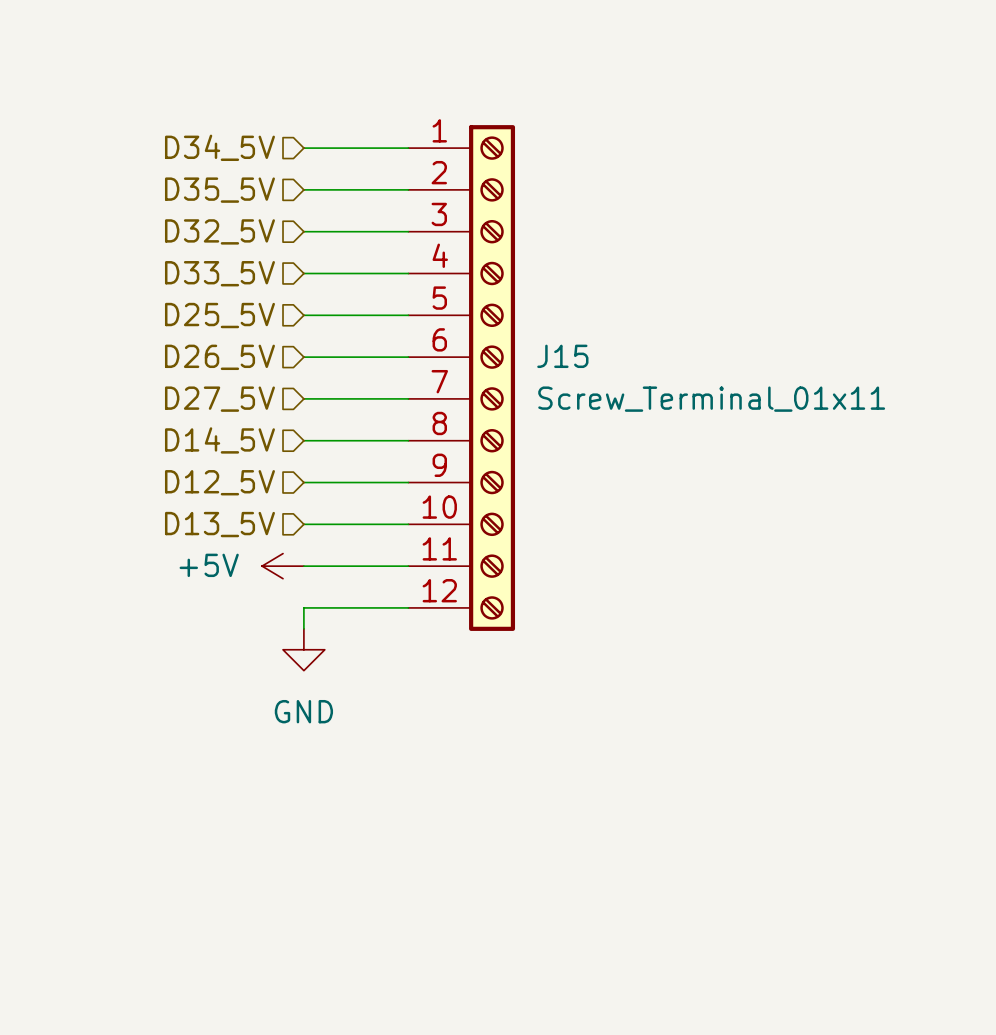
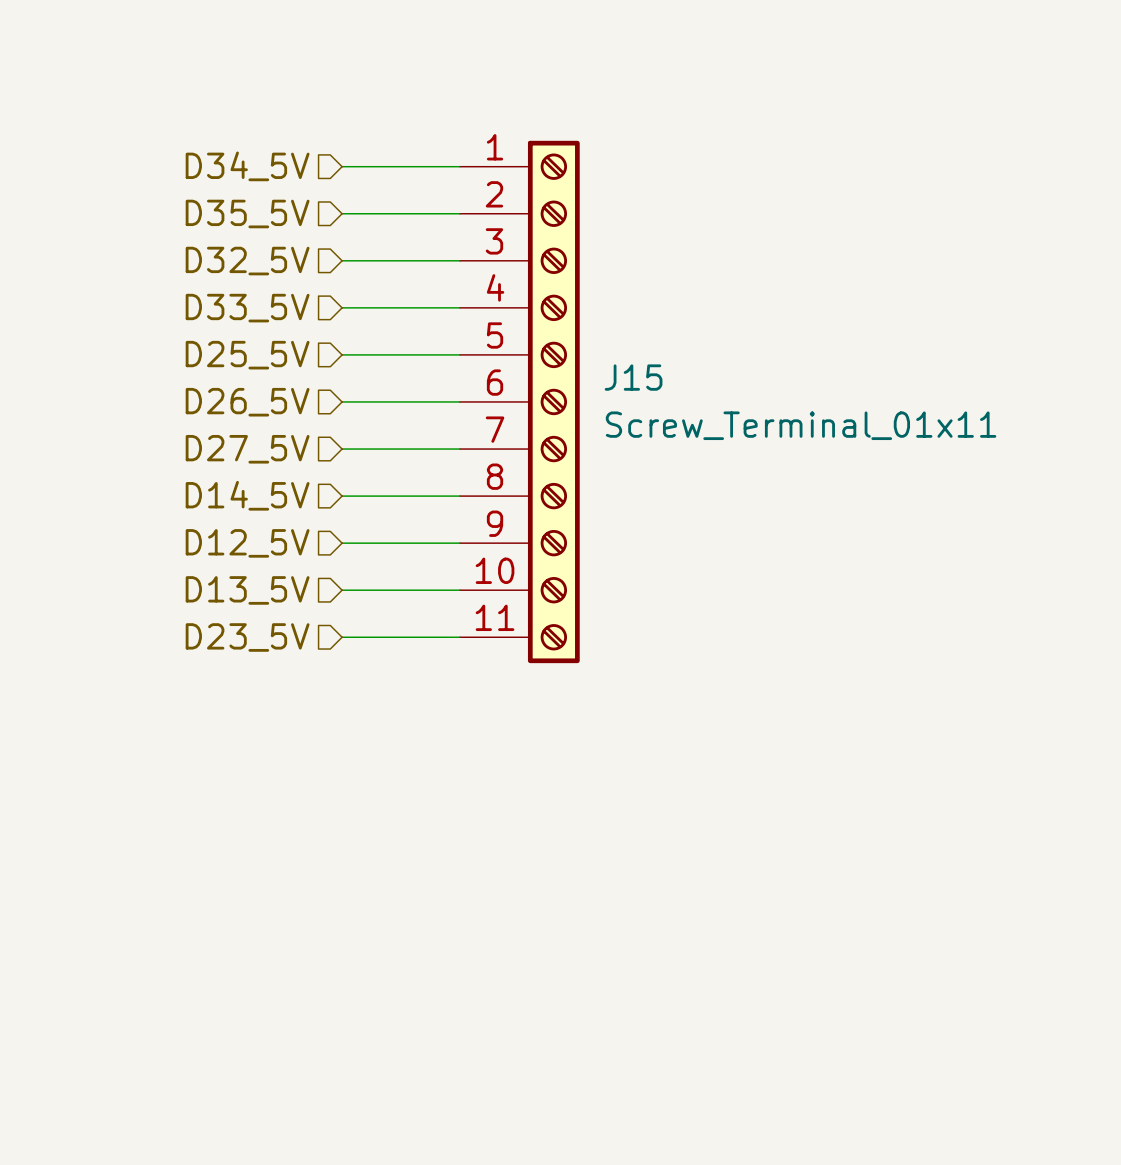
J15 symbol: [408, 125, 516, 631] -> [459, 140, 580, 664]
hierarchical label: none -> D23_5V (247, 637)
power symbol: +5V (283, 566) -> none
wire: (408, 607) (303, 607) (303, 628) -> none
power symbol: GND (303, 649) -> none

